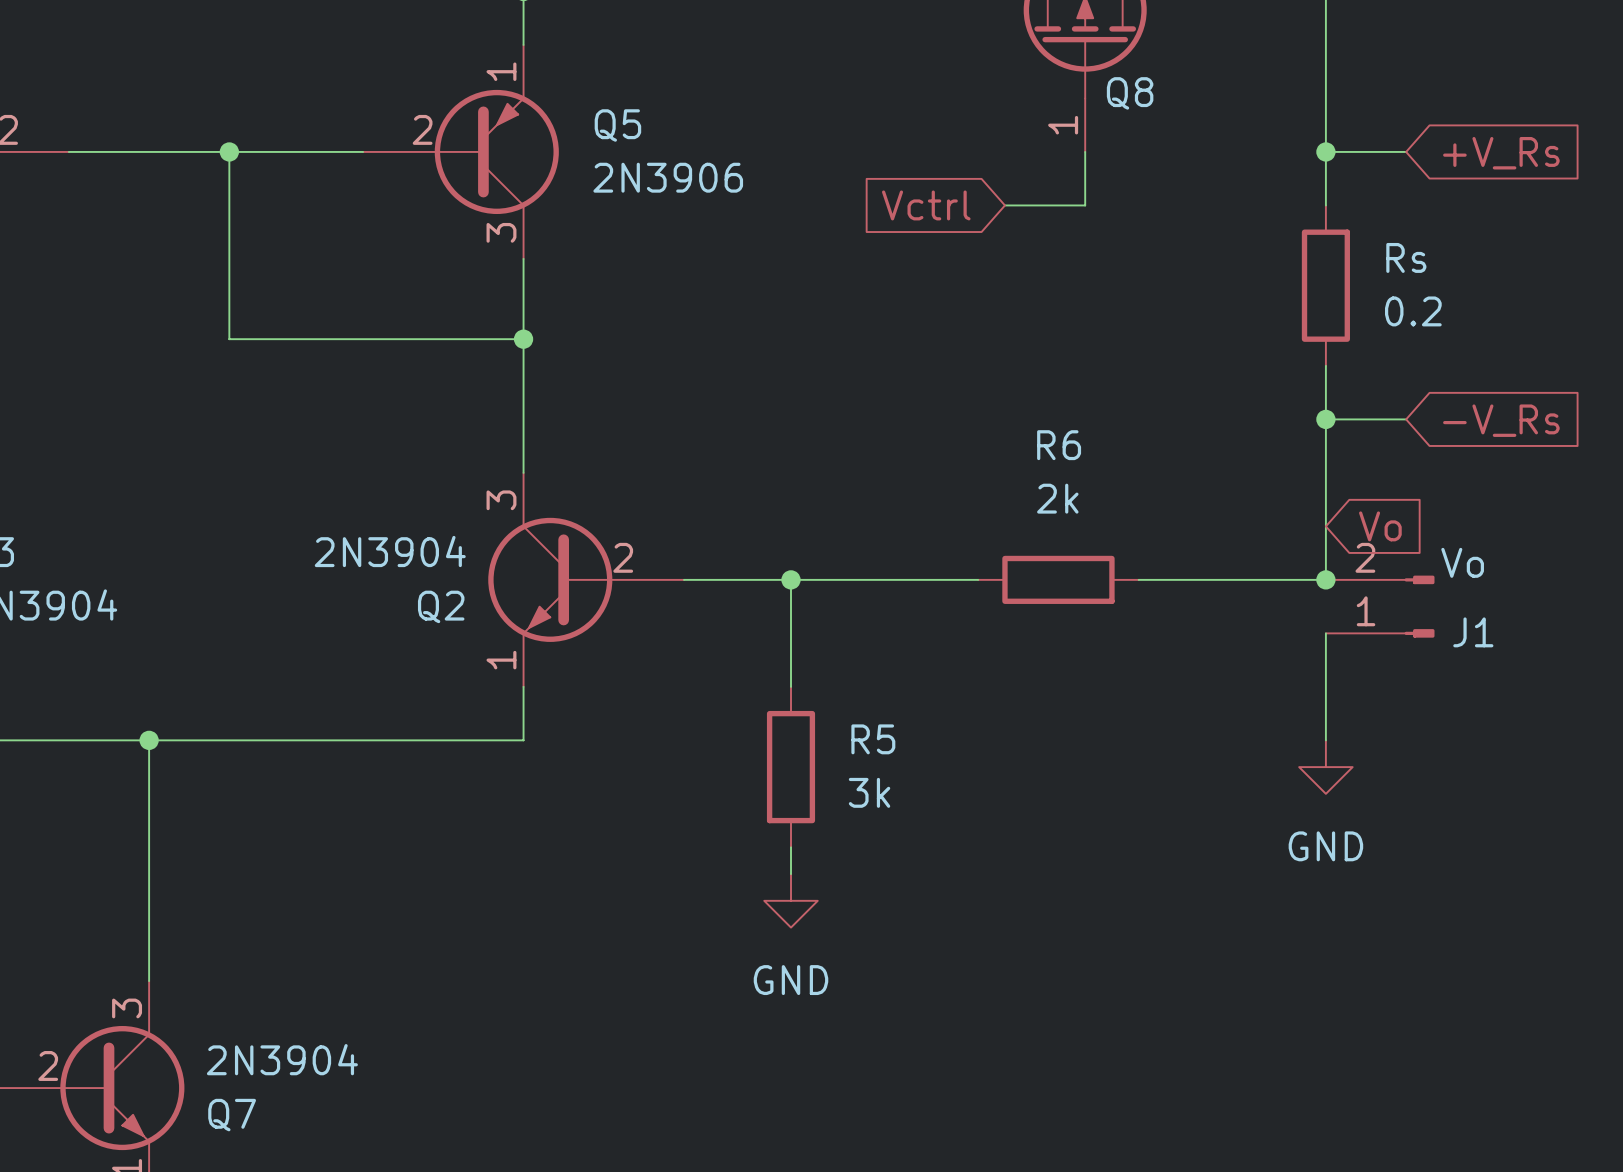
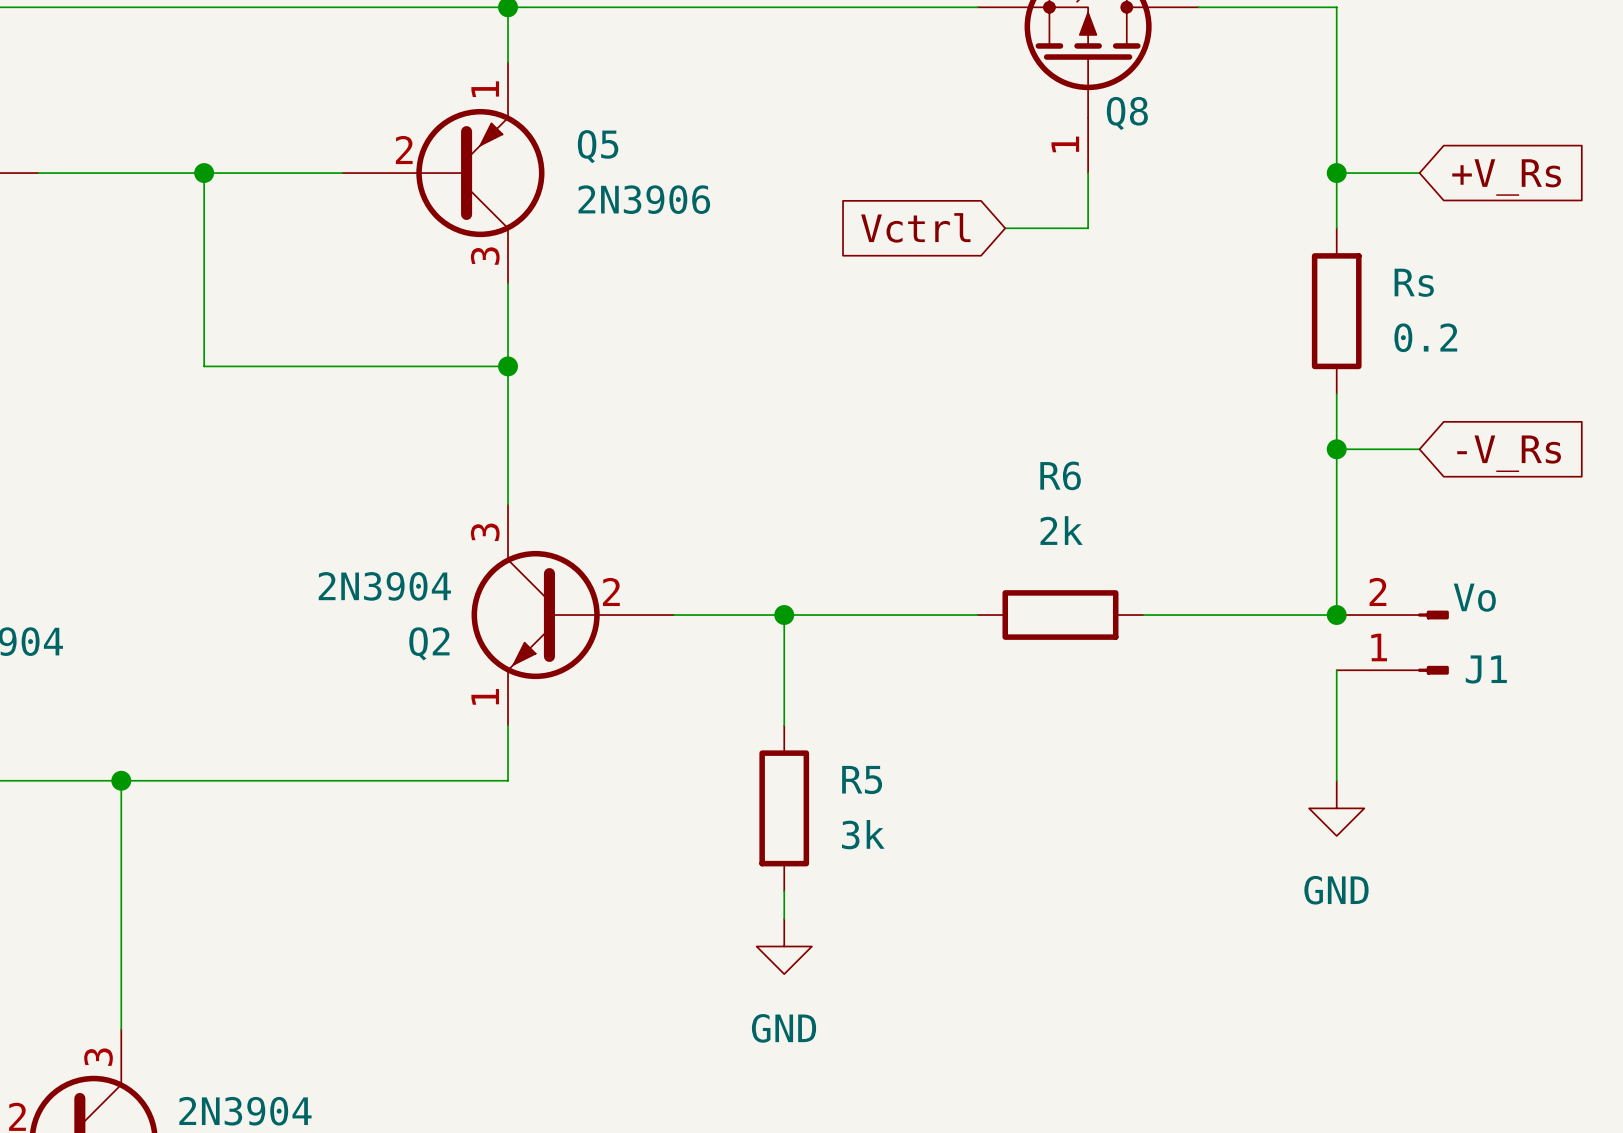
global label: Vo (1380, 526) -> none

